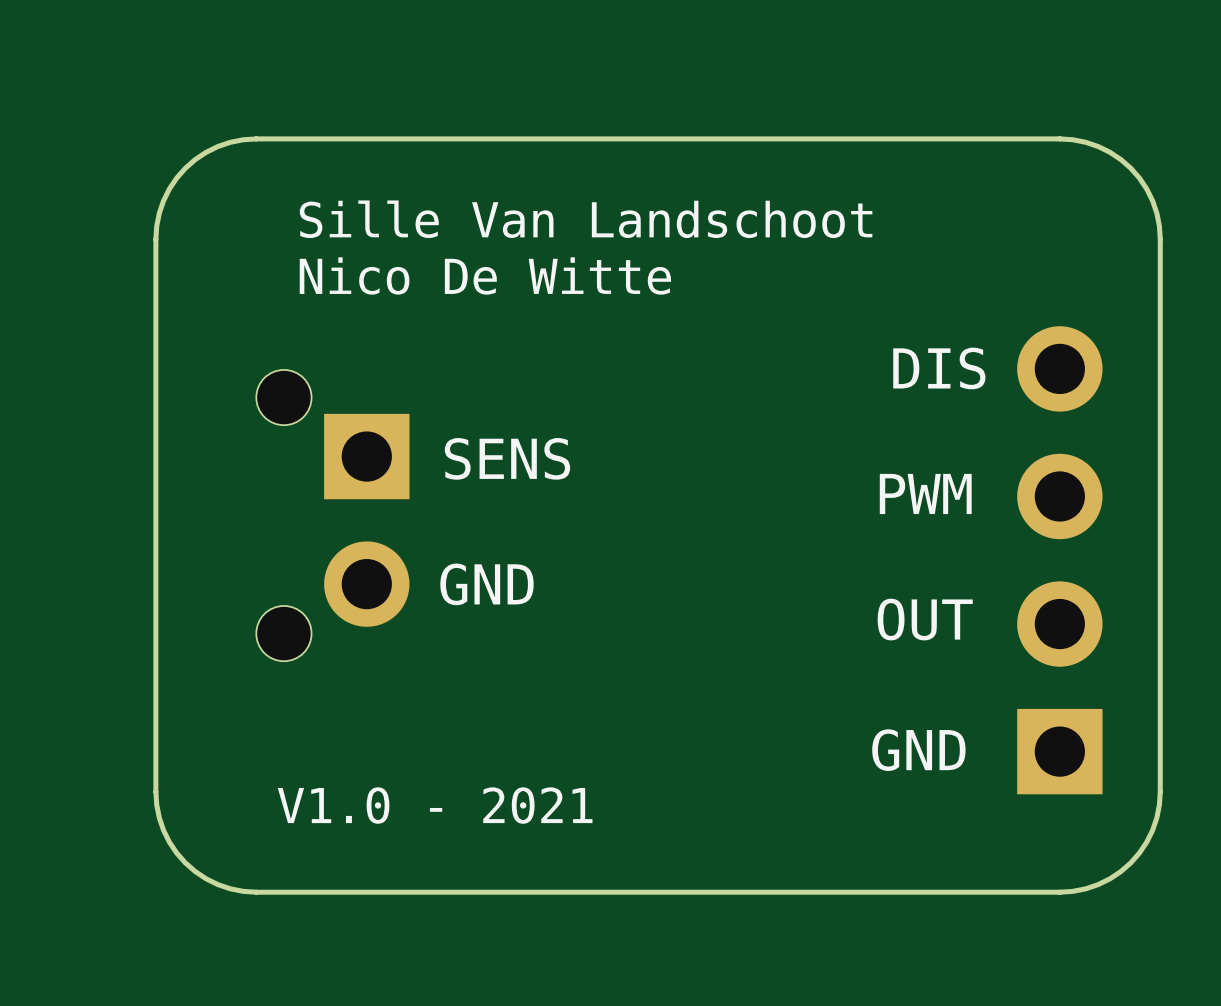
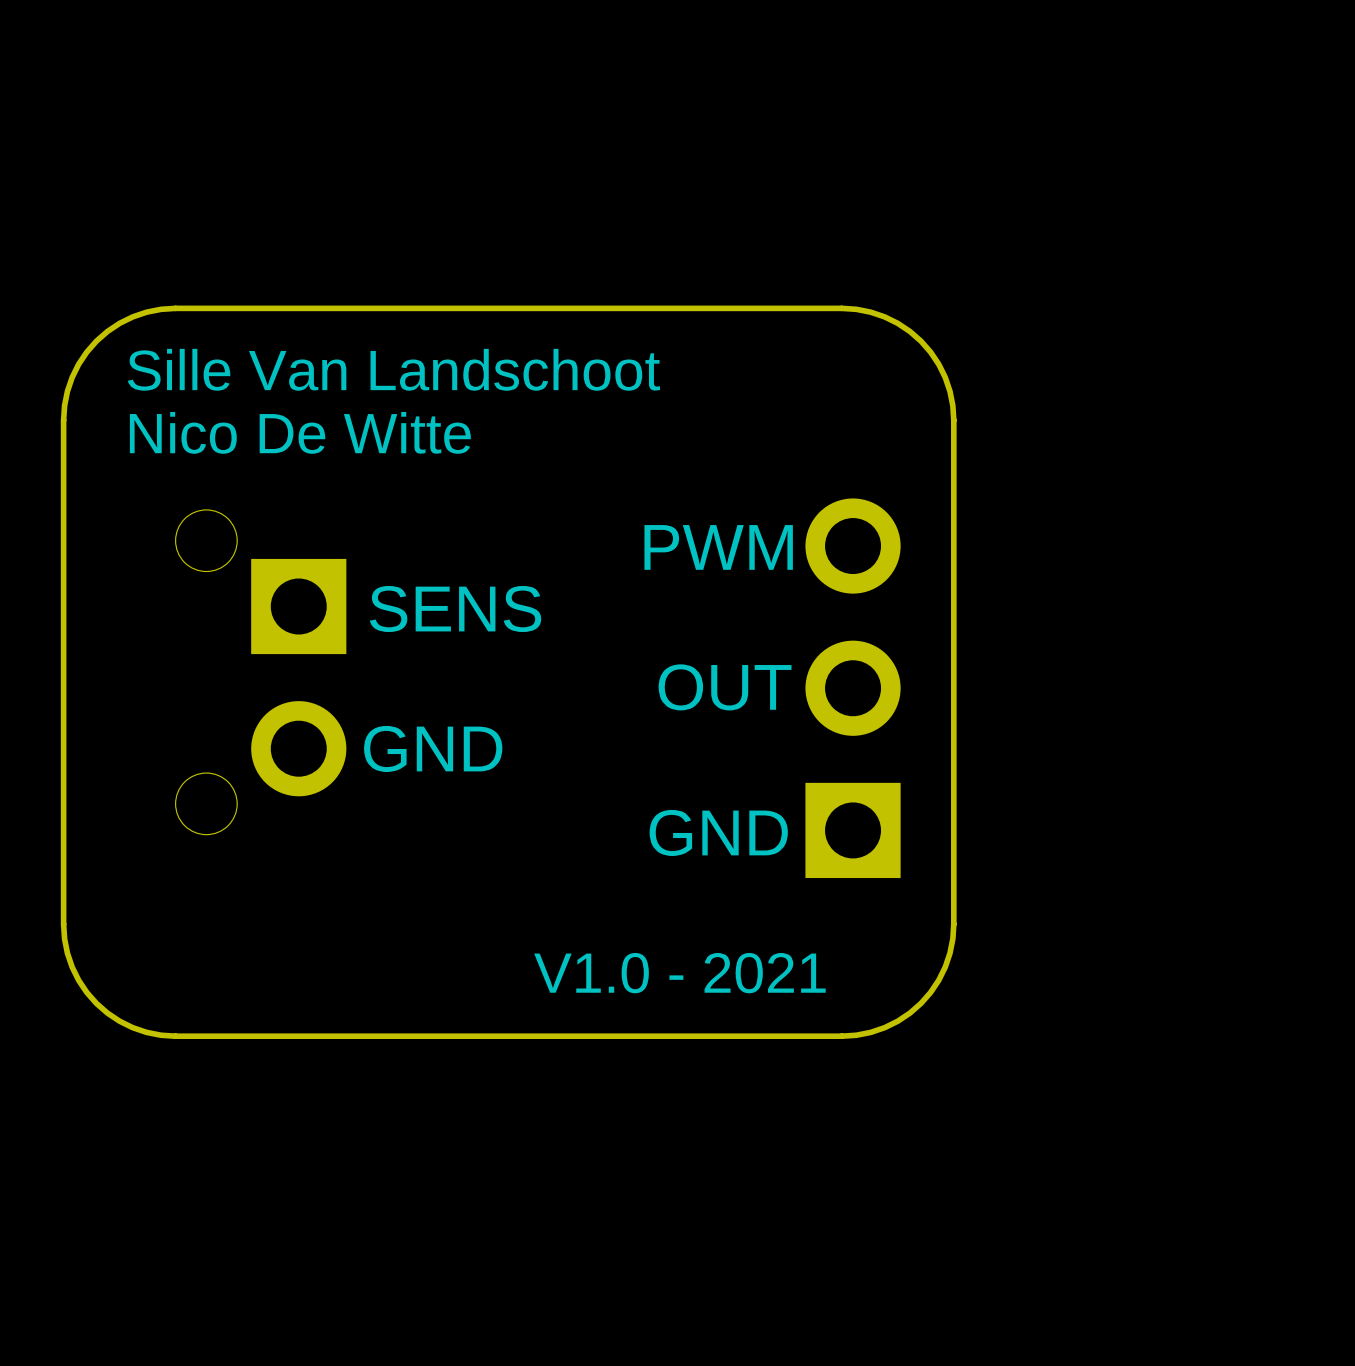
text position: Sille Van Landschoot (586, 219) -> Sille Van Landschoot (393, 369)
text position: Nico De Witte (485, 275) -> Nico De Witte (300, 432)
board edge: (155, 289) (156, 226) (163, 200) (169, 189) (185, 168) (206, 152) (230, 142) (256, 138) (1072, 139) (1085, 142) (1110, 152) (1130, 168) (1139, 178) (1152, 200) (1159, 226) (1160, 239) (1159, 804) (1152, 830) (1139, 852) (1130, 862) (1110, 878) (1085, 888) (1059, 892) (243, 891) (230, 888) (206, 878) (185, 862) (169, 842) (163, 830) (156, 804) (155, 741) -> (63, 420) (64, 405) (72, 377) (86, 352) (96, 341) (119, 323) (132, 316) (146, 312) (175, 308) (856, 309) (870, 312) (897, 323) (921, 341) (930, 352) (945, 377) (952, 405) (953, 420) (952, 938) (945, 967) (930, 992) (921, 1003) (897, 1021) (870, 1032) (841, 1036) (160, 1035) (146, 1032) (119, 1021) (96, 1003) (86, 992) (72, 967) (64, 938) (63, 924)
text: DIS (939, 368) -> none
text position: PWM (925, 493) -> PWM (718, 547)
part: none -> (853, 688)
part: (1059, 560) -> none
text position: OUT (925, 619) -> OUT (725, 687)
text position: GND (918, 750) -> GND (718, 832)
text position: V1.0 - 2021 (435, 805) -> V1.0 - 2021 (679, 973)

